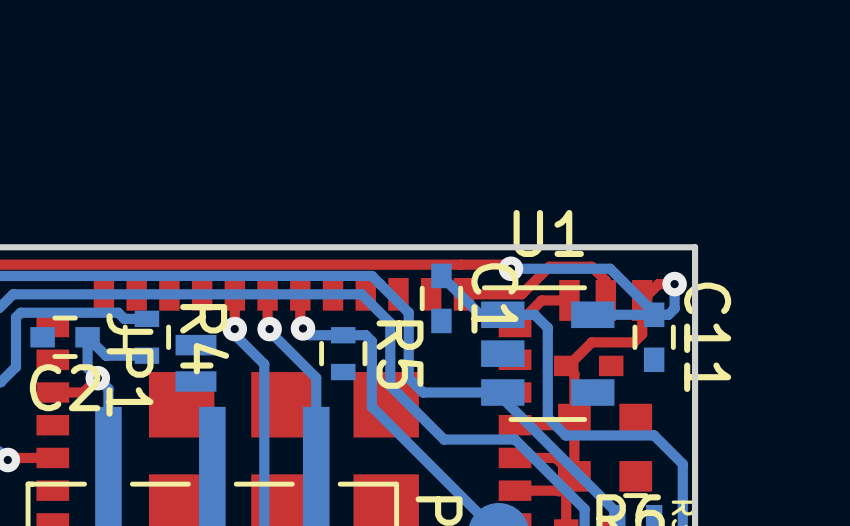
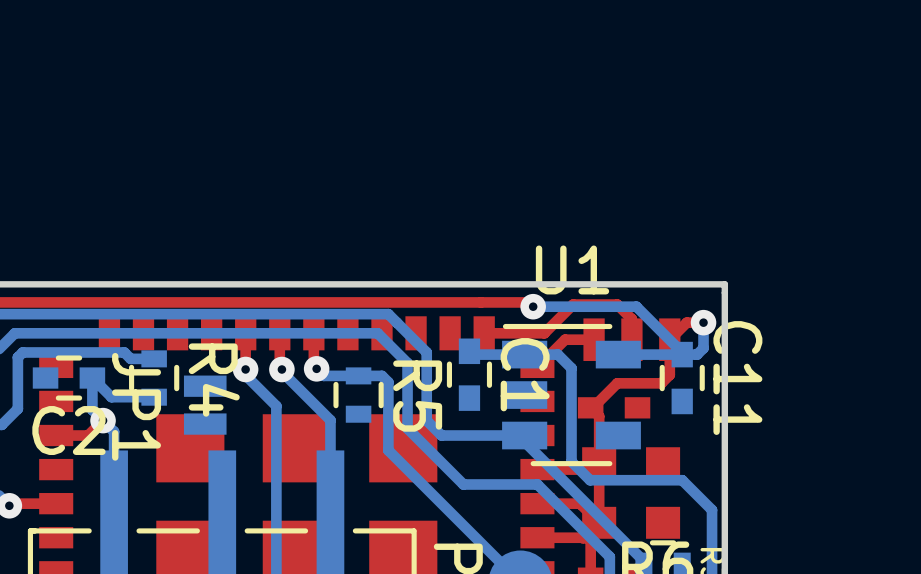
bottom track: (441, 275) (480, 314) -> (469, 351) (472, 354) (501, 354)
C1 position: (441, 298) -> (469, 374)

